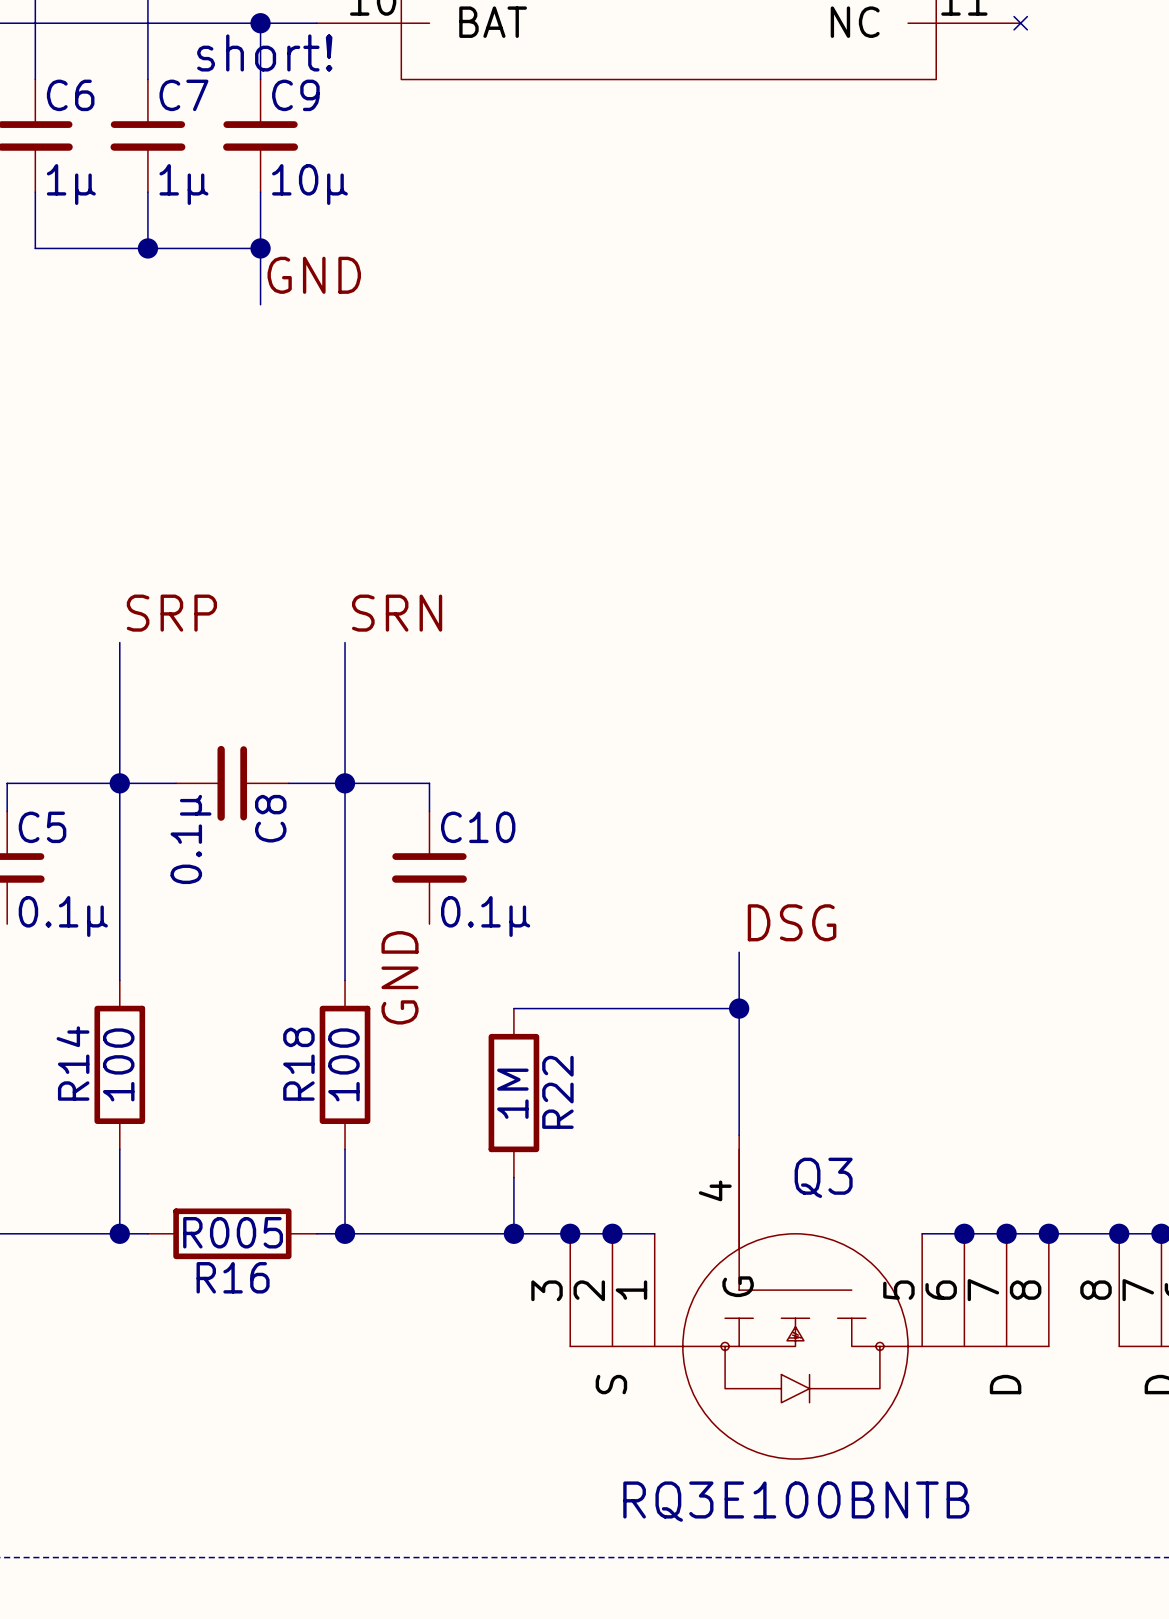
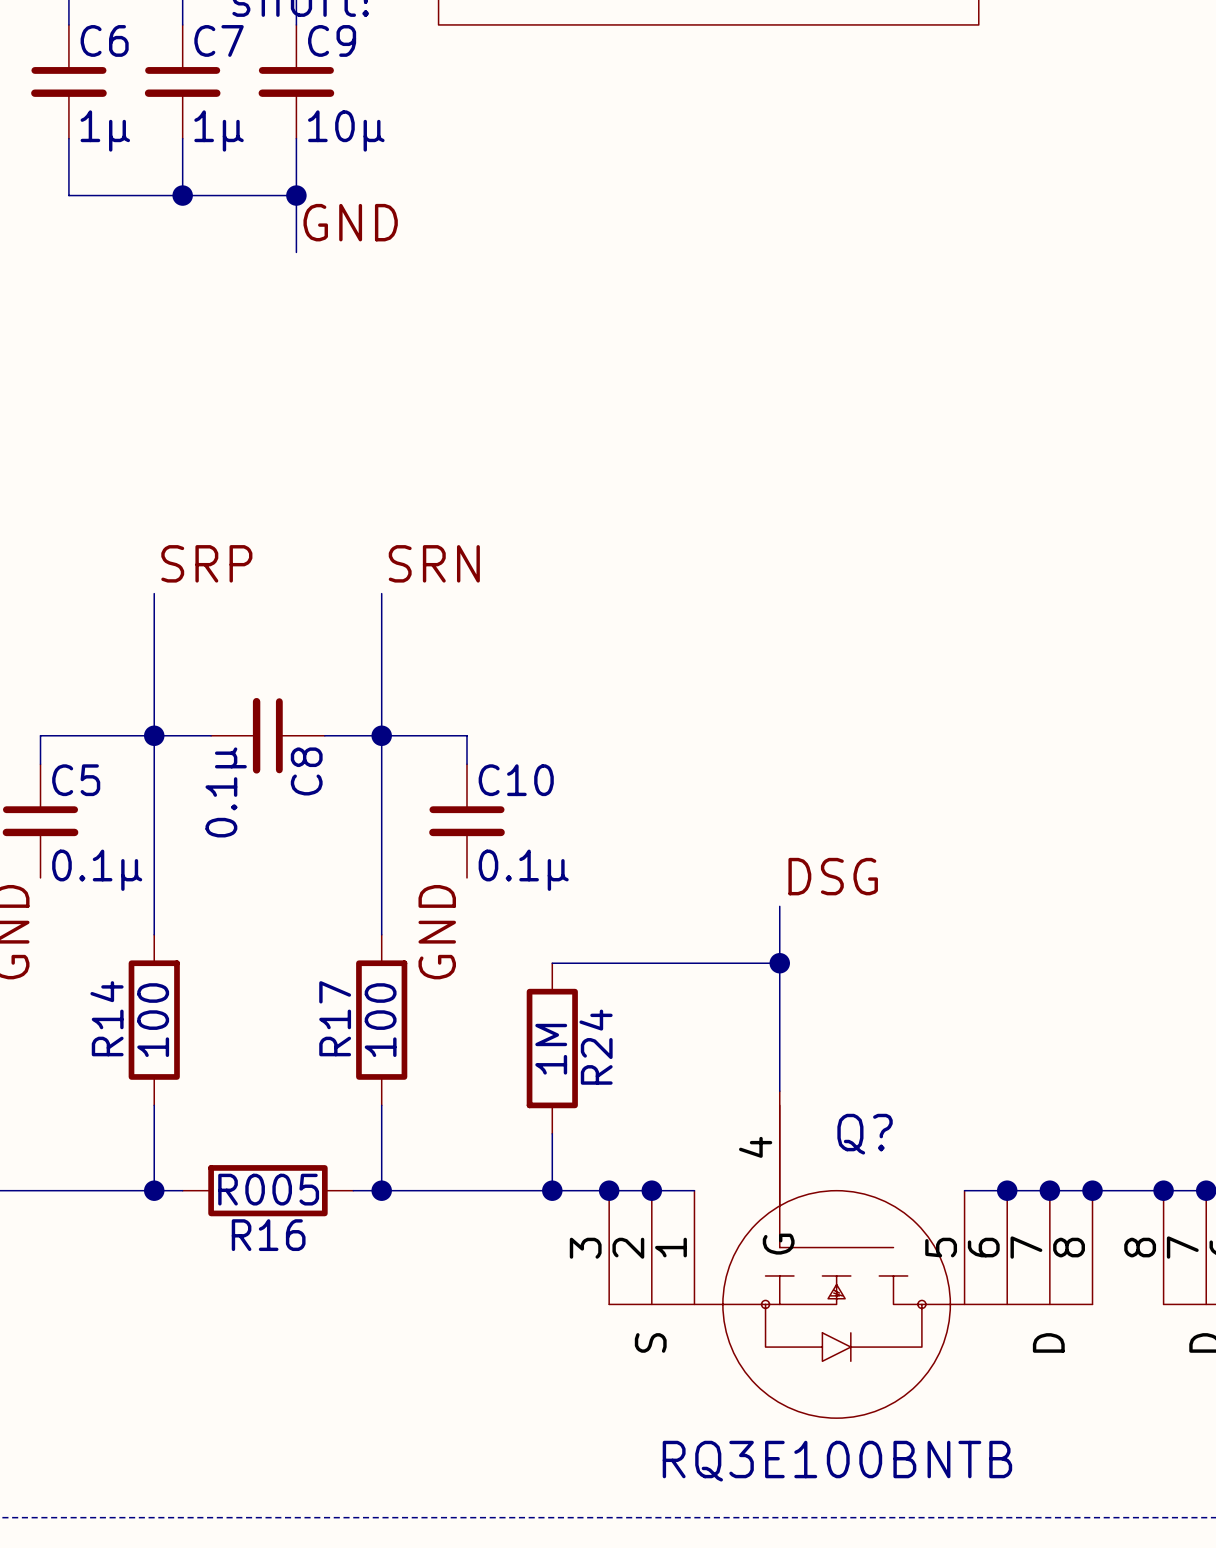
R18 name: R18 (298, 1064) -> R17 (335, 1018)
R22 name: R22 (557, 1092) -> R24 (596, 1047)
Q3 name: Q3 (823, 1177) -> Q? (865, 1134)

